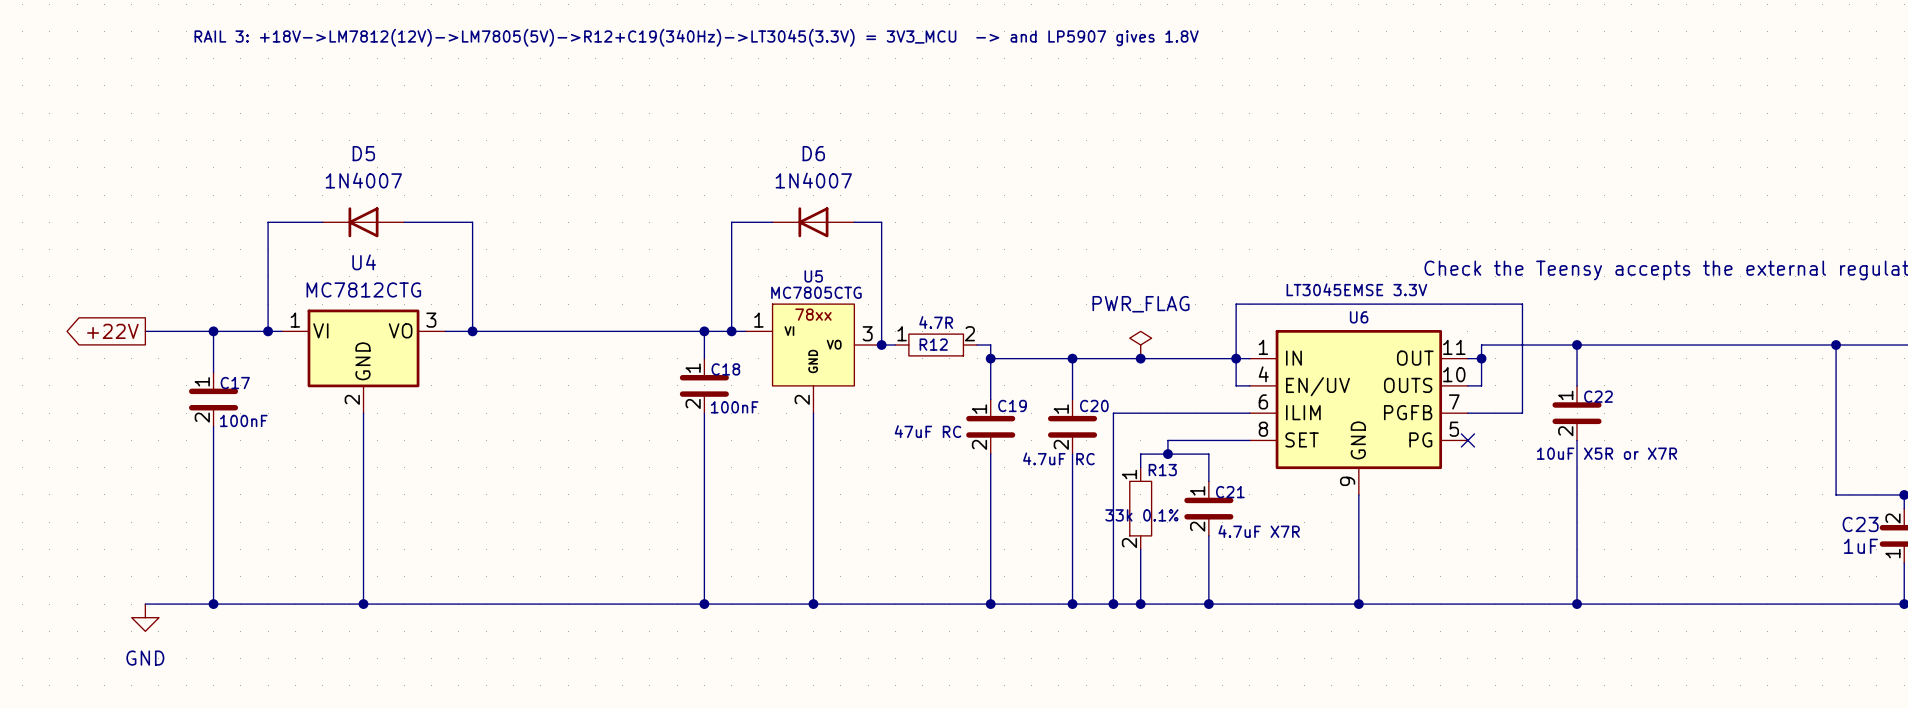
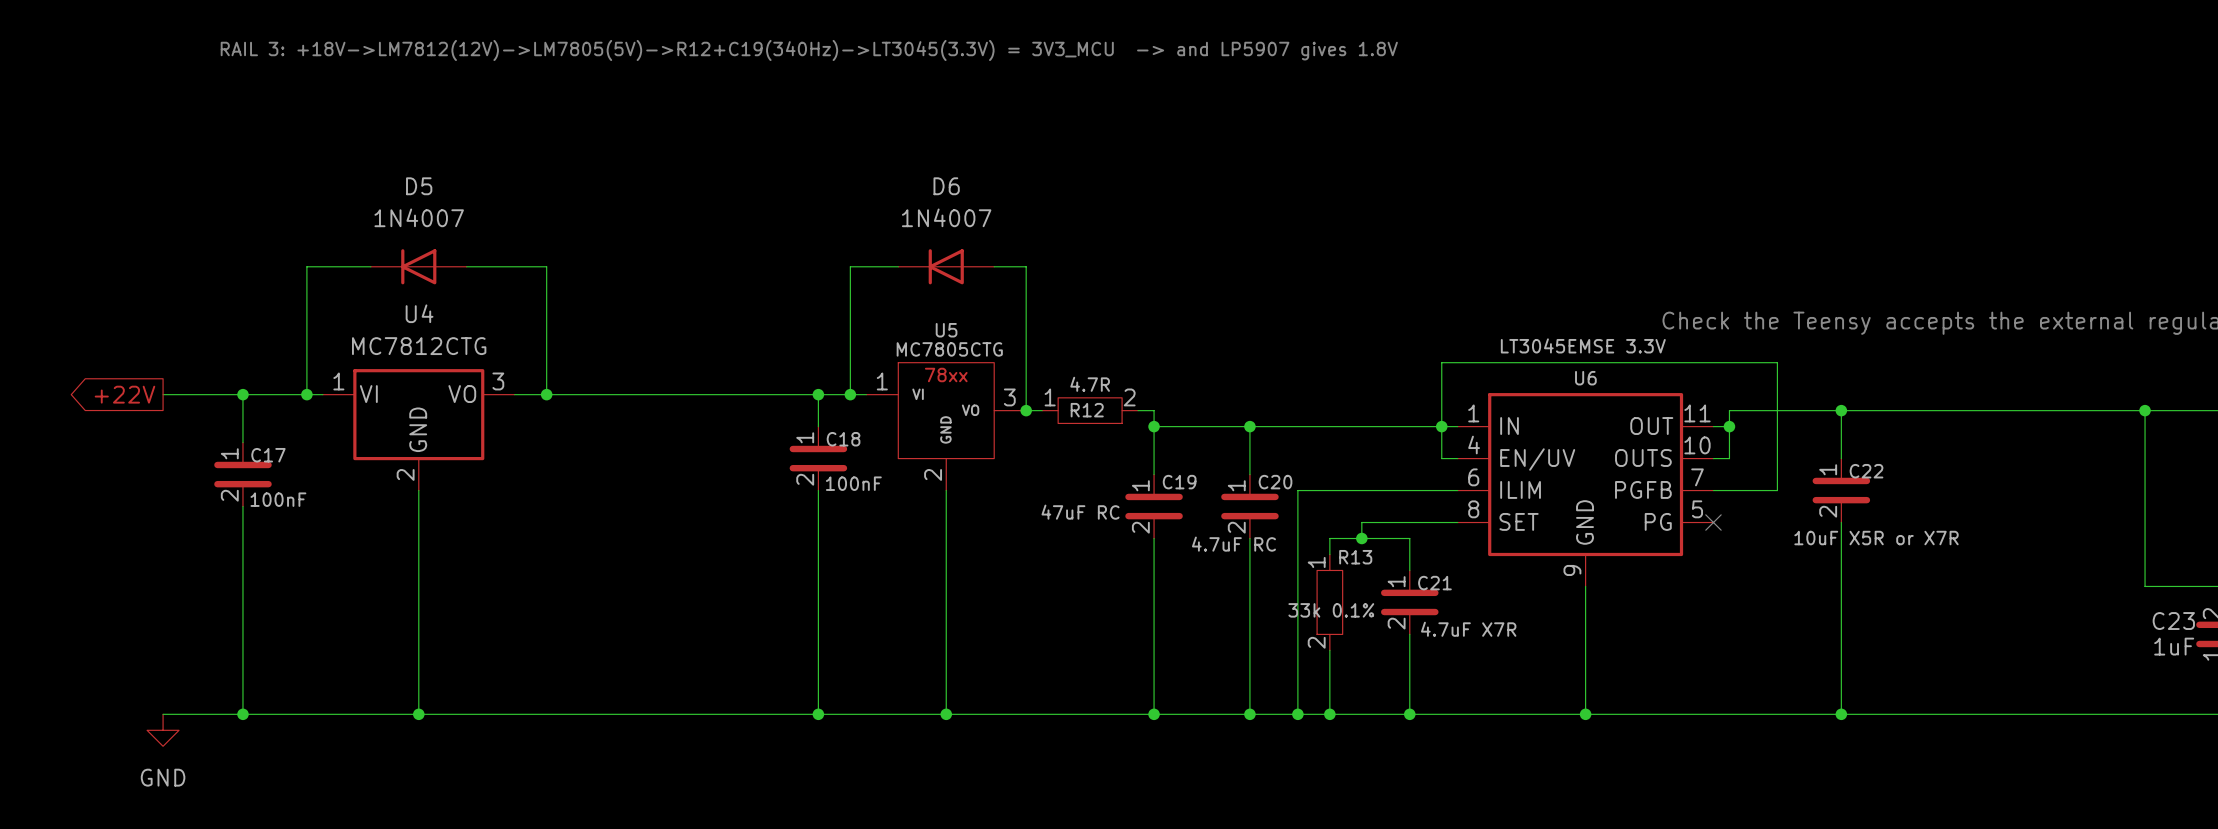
power symbol: PWR_FLAG (1140, 345) -> none
junction: (1140, 358) -> none

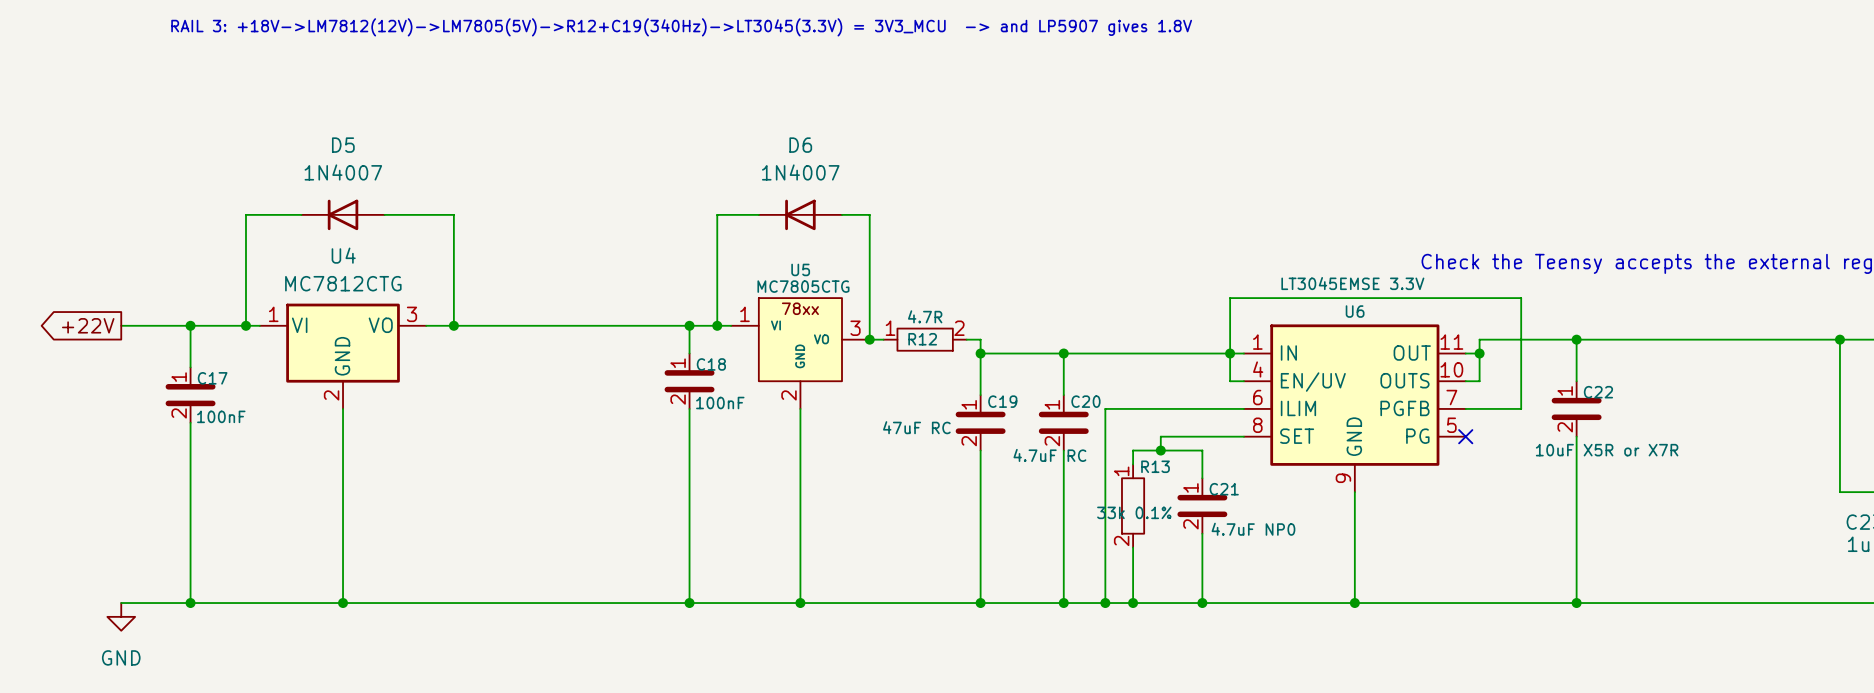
C21 value: 4.7uF X7R (1468, 629) -> 4.7uF NP0 (1253, 529)

